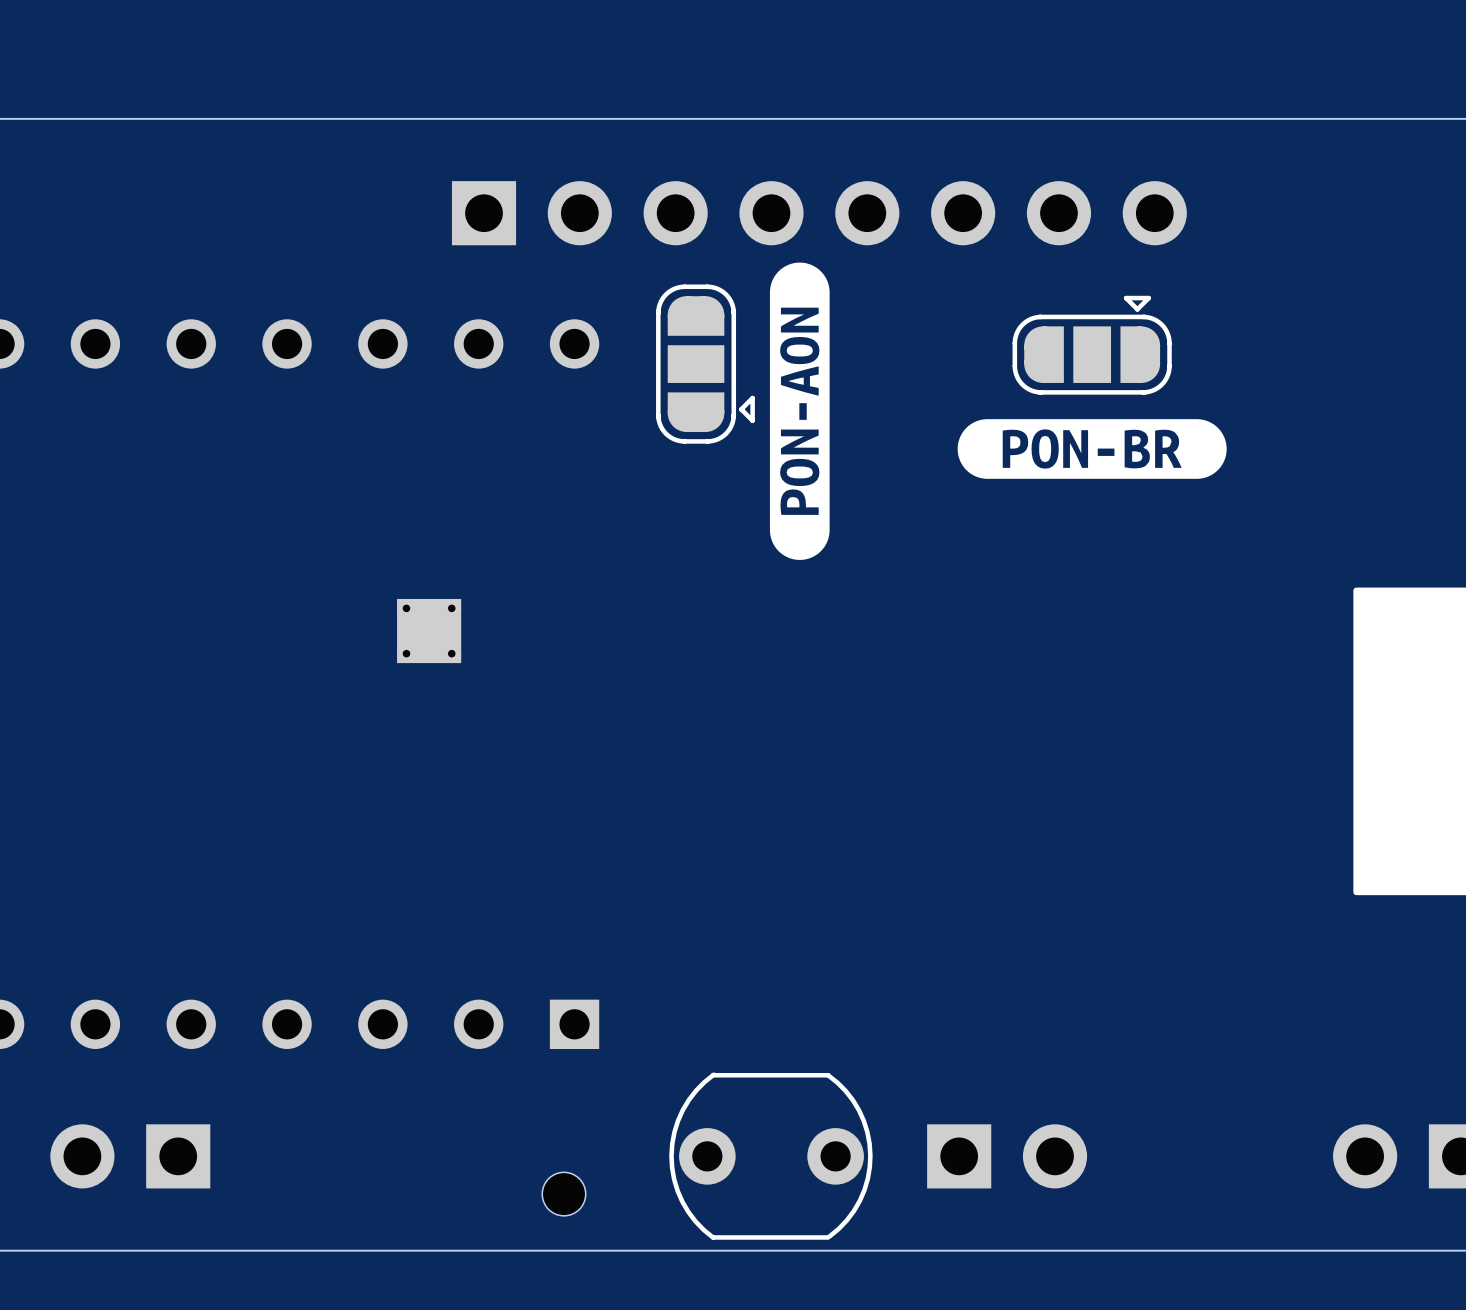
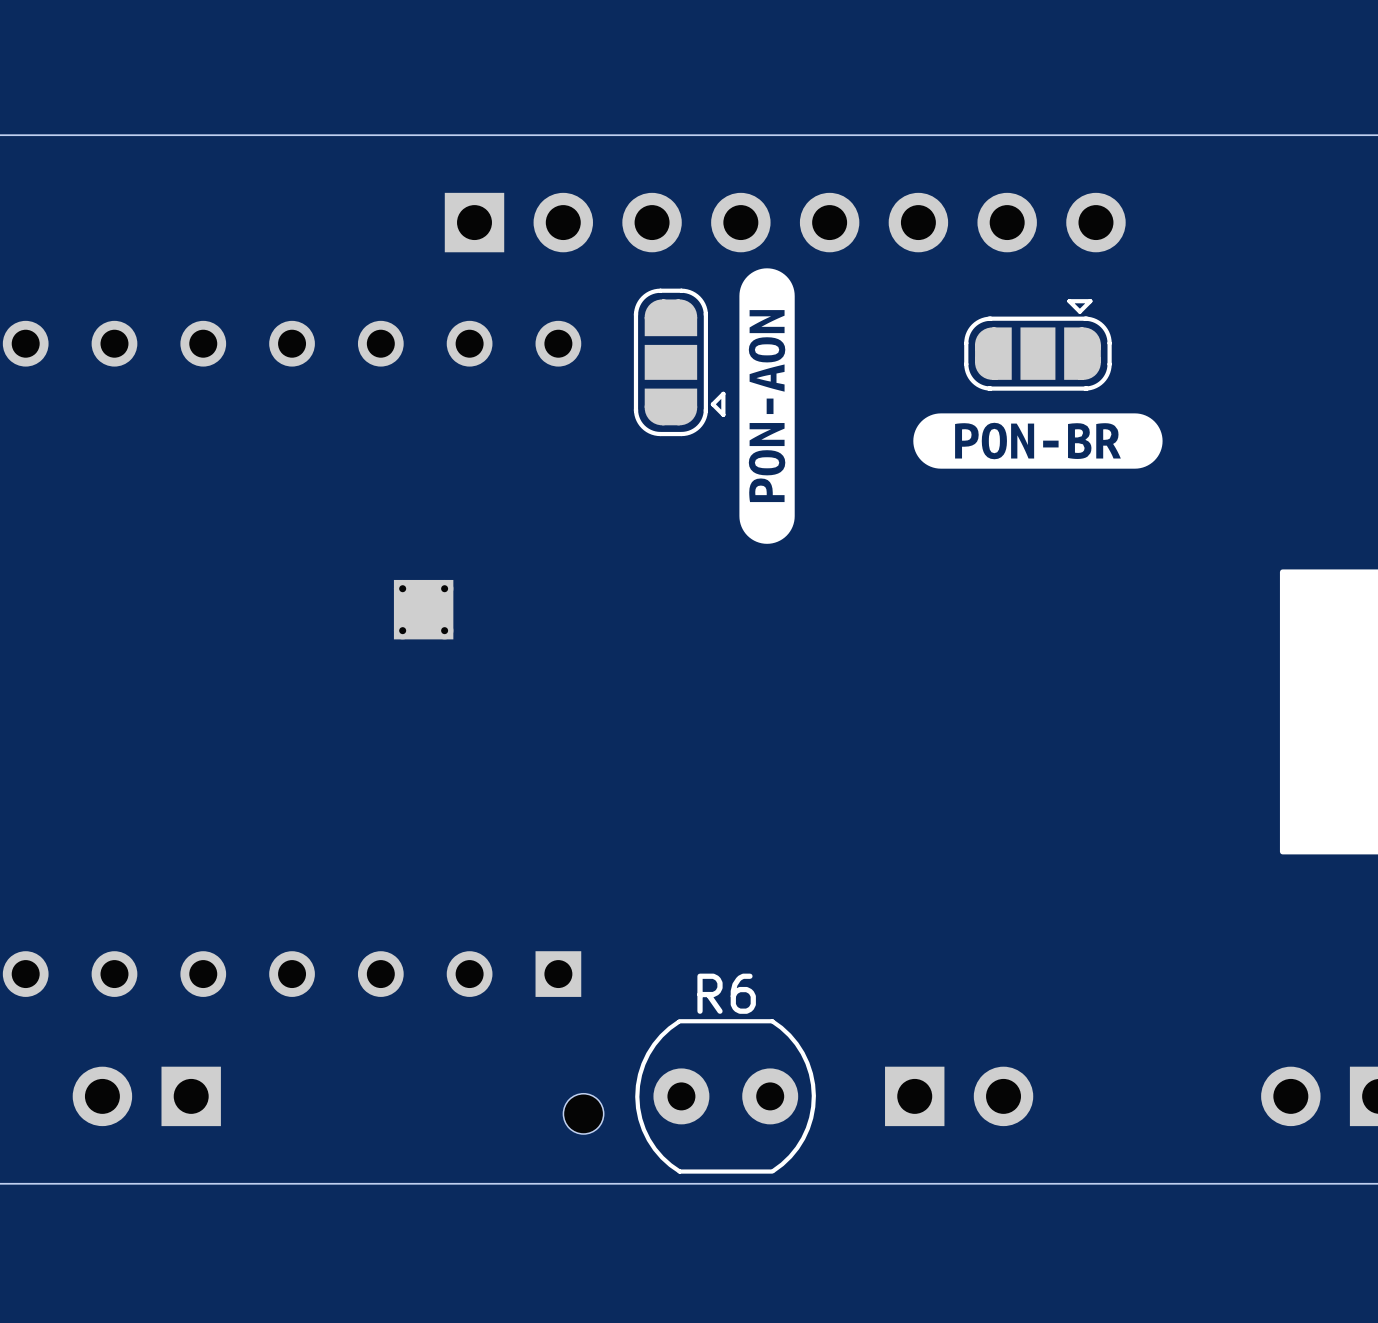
R6: none -> (725, 1096)
part: (770, 1156) -> none
part position: (563, 1194) -> (583, 1113)

